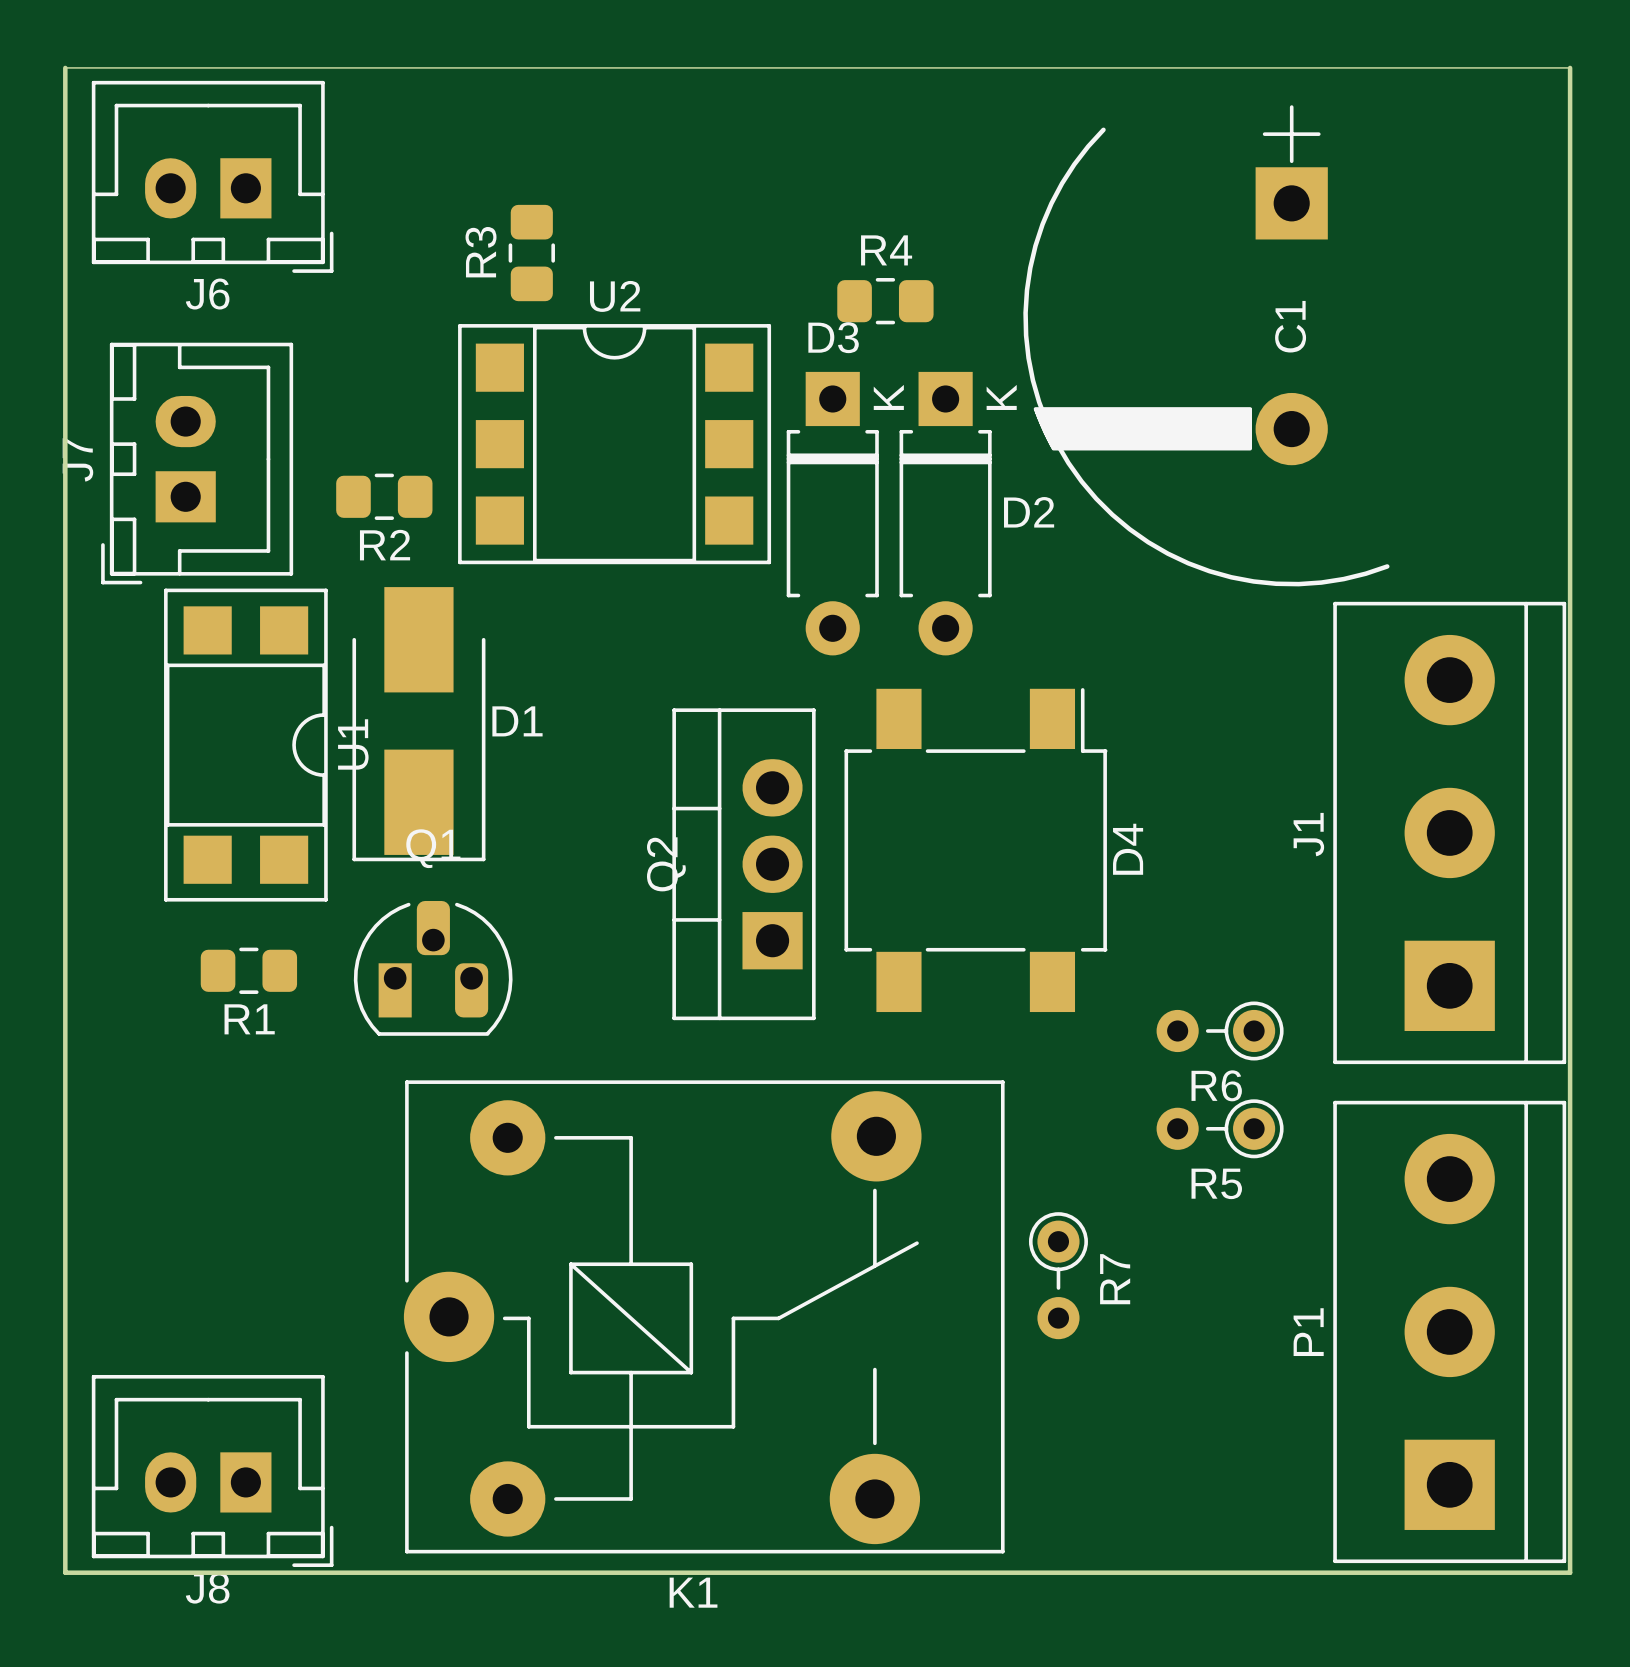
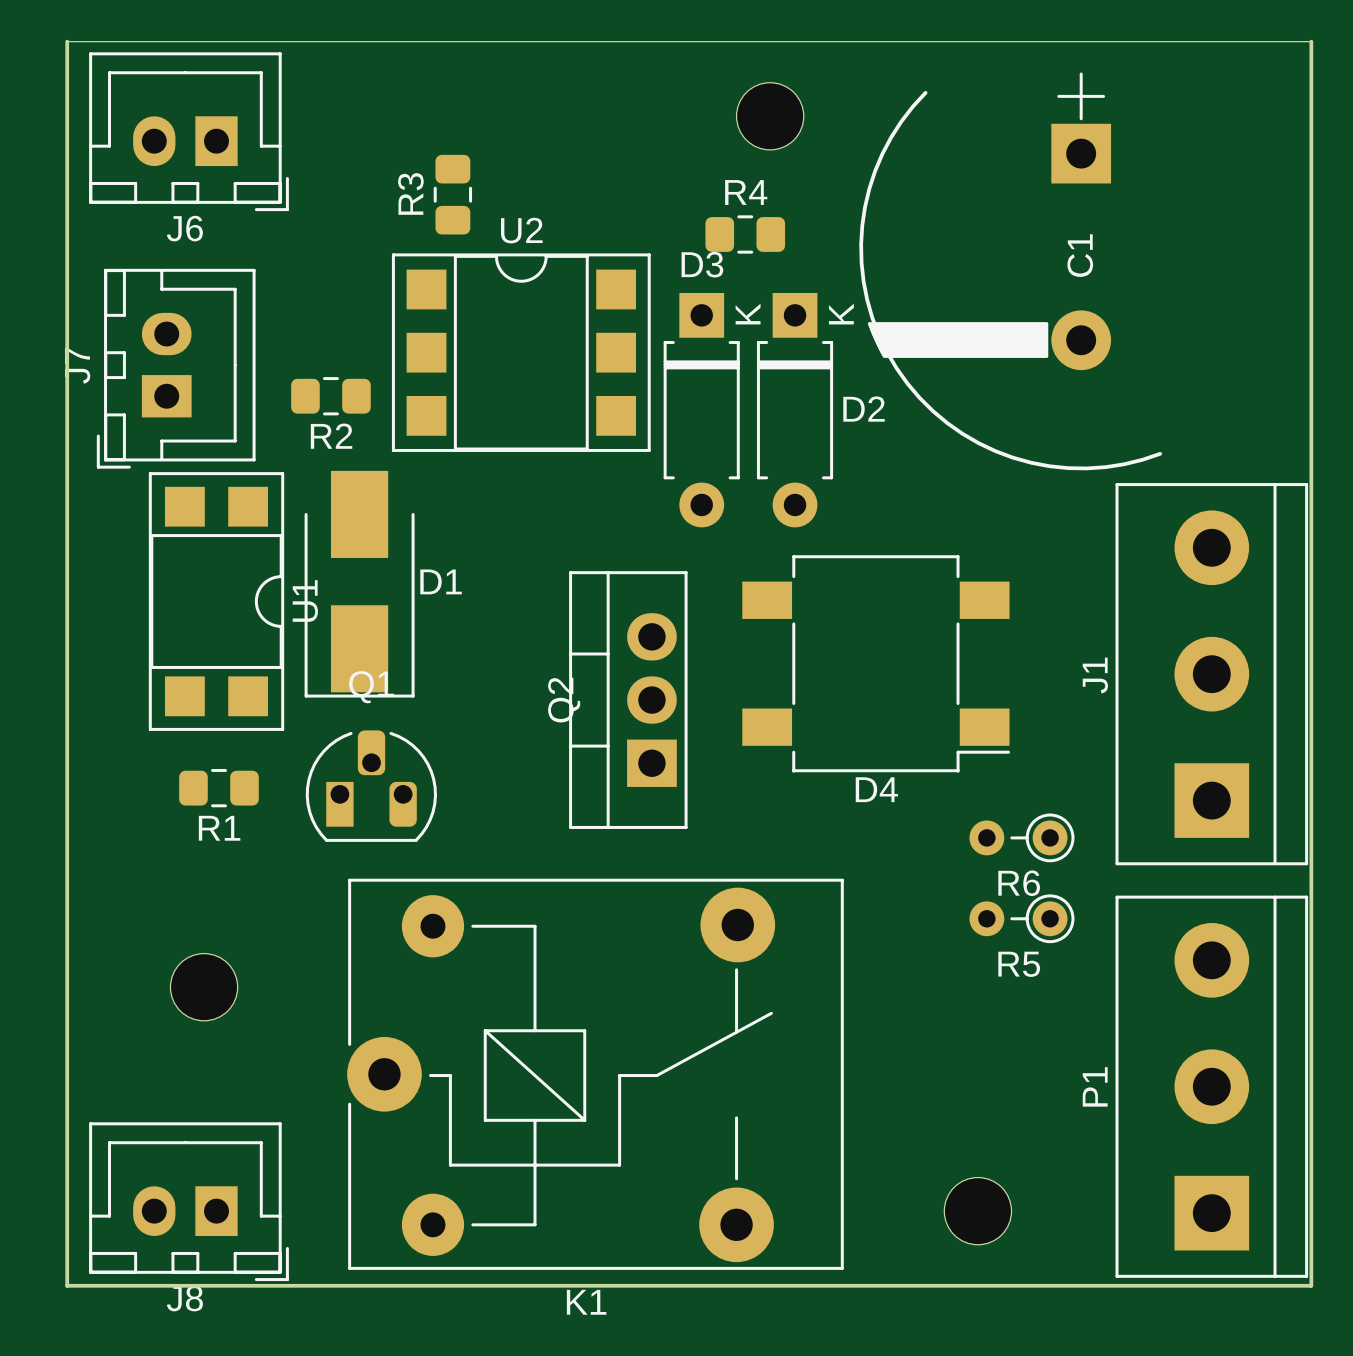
part: none -> (770, 116)
D4 rotation: 0° (975, 850) -> 90° clockwise (876, 663)
part: none -> (204, 987)
R7: (1058, 1275) -> none
part: none -> (977, 1211)

